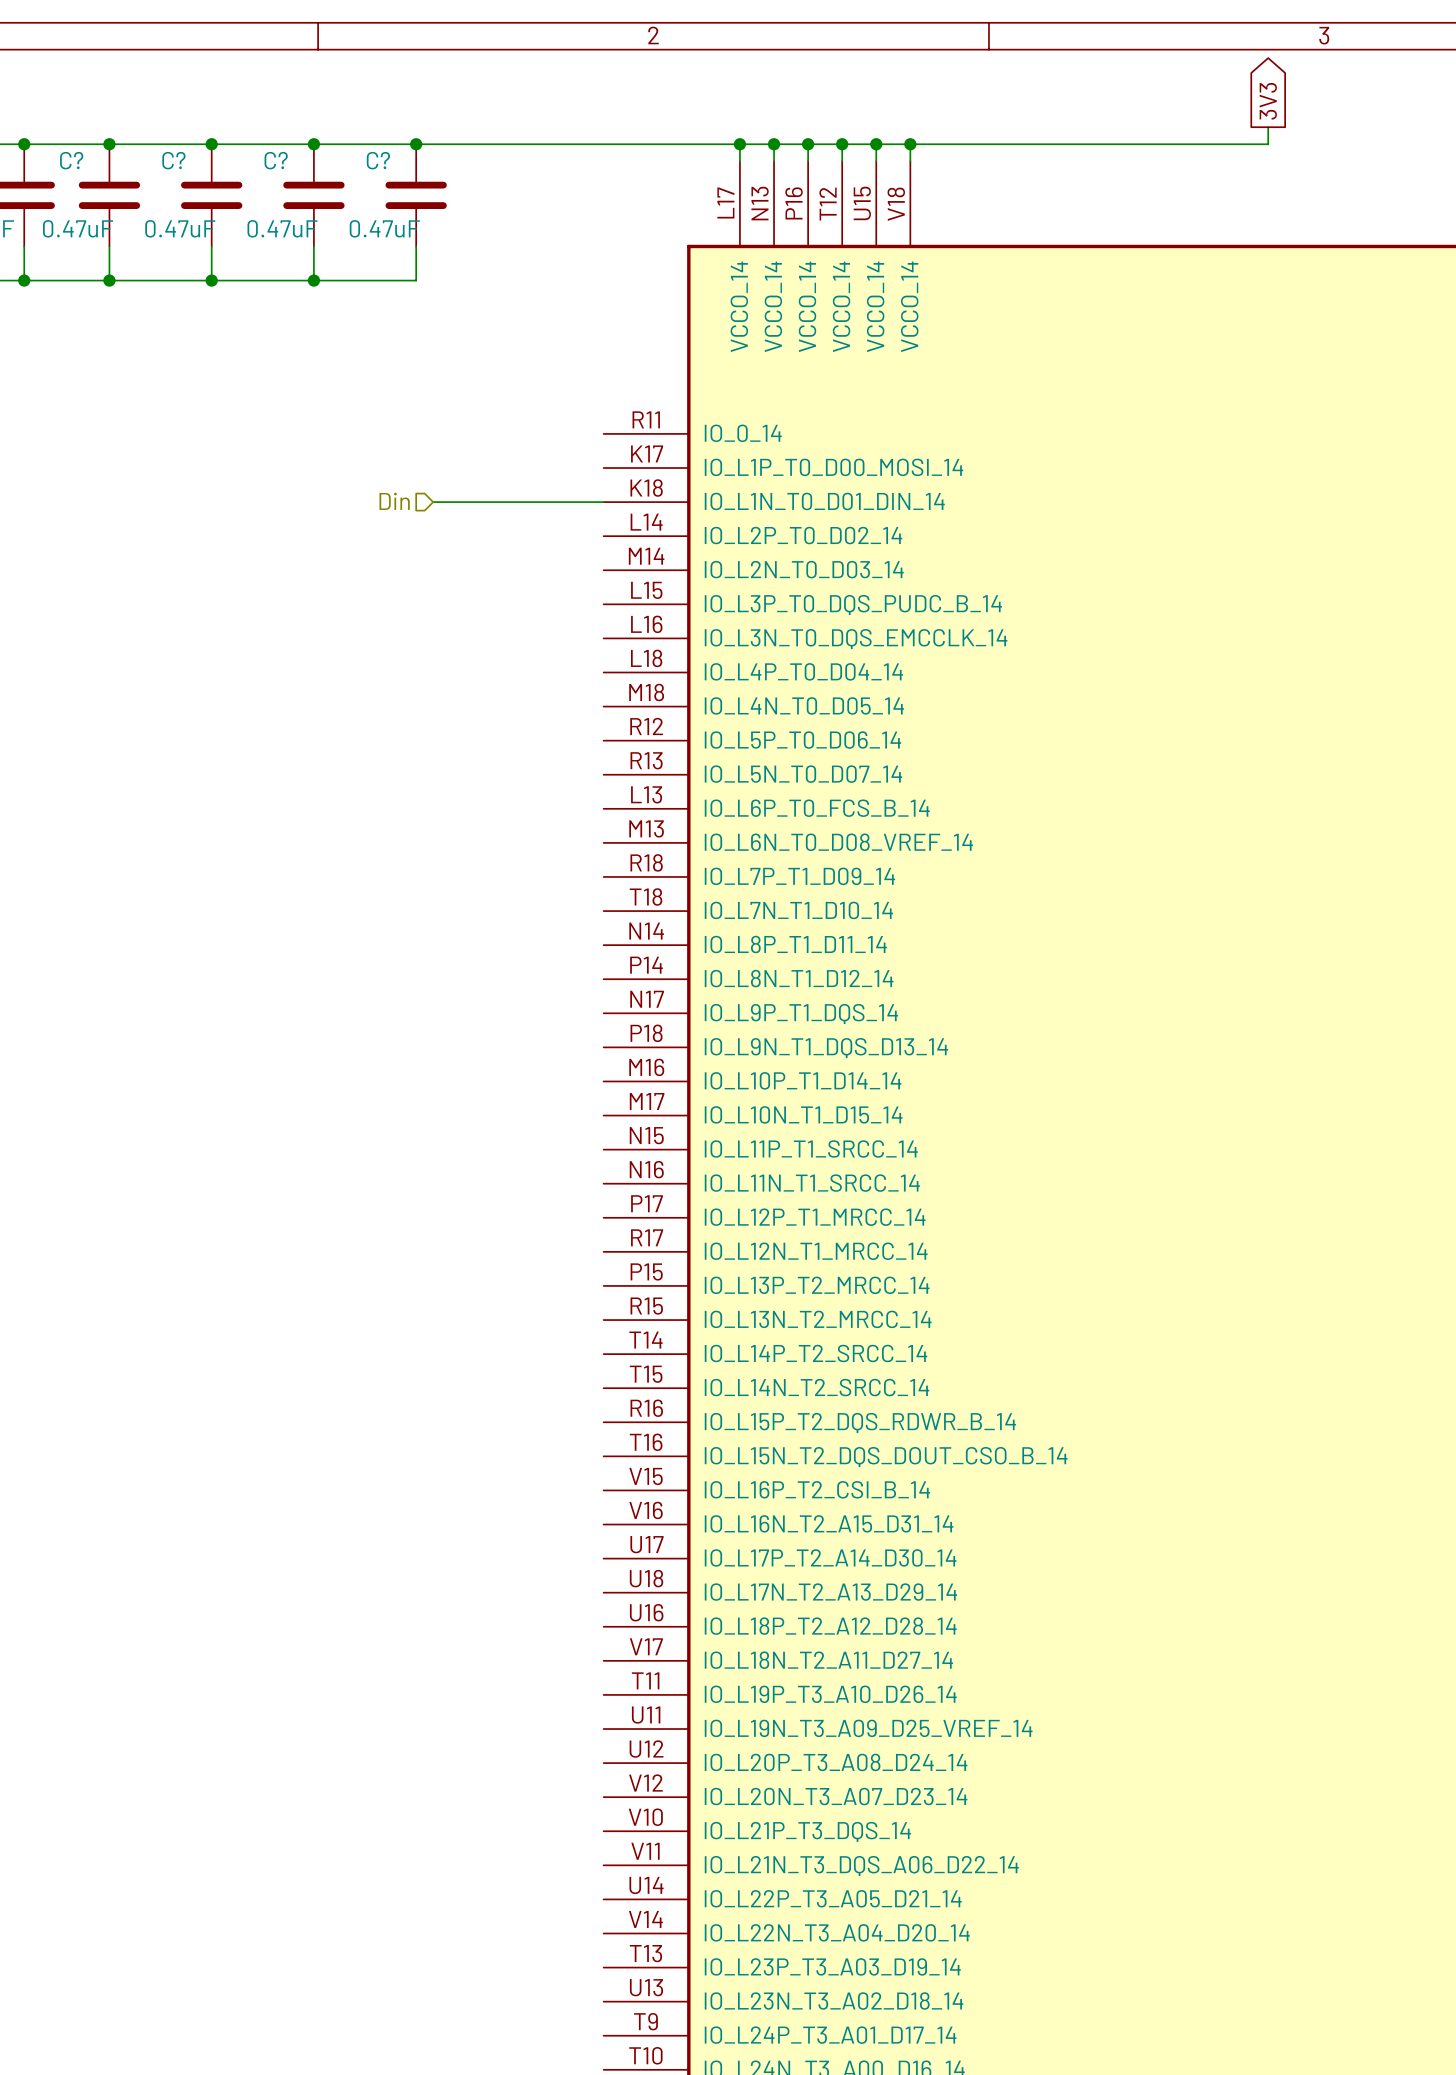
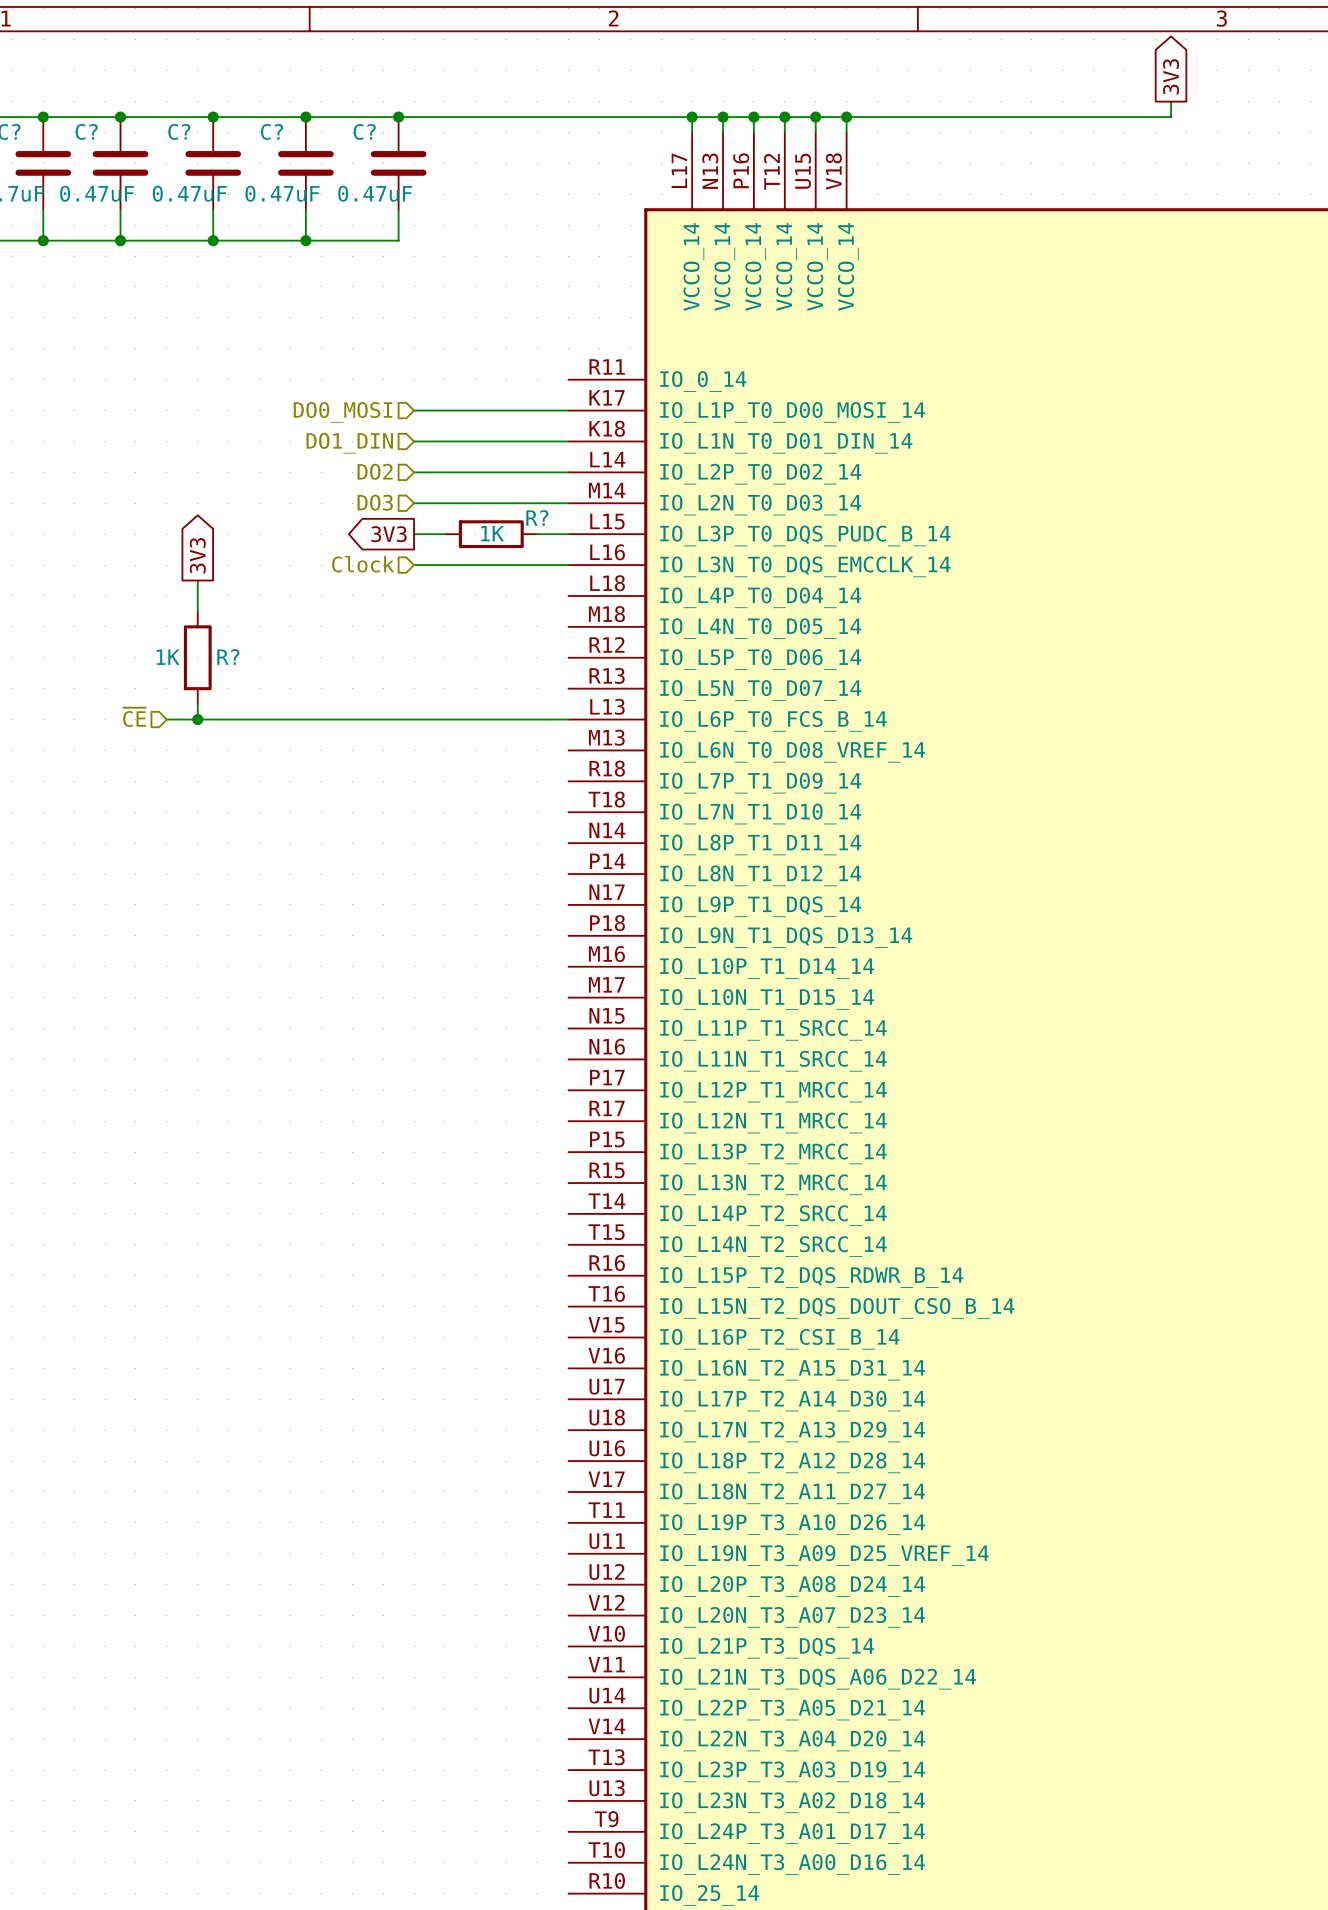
hierarchical label: none -> DO0_MOSI (343, 412)
wire: none -> (414, 410) (568, 410)
hierarchical label: Din (394, 501) -> DO1_DIN (349, 443)
hierarchical label: none -> DO2 (375, 471)
wire: none -> (414, 472) (568, 472)
hierarchical label: none -> DO3 (375, 502)
wire: none -> (414, 503) (568, 503)
global label: none -> 3V3 (389, 534)
wire: none -> (414, 534) (444, 534)
R?: none -> 1K (491, 534)
wire: none -> (537, 534) (568, 534)
global label: none -> 3V3 (197, 555)
hierarchical label: none -> Clock (363, 564)
wire: none -> (414, 565) (568, 565)
wire: none -> (197, 580) (197, 611)
R?: none -> 1K (197, 657)
wire: none -> (197, 704) (197, 719)
hierarchical label: none -> ~{CE} (134, 717)
wire: none -> (166, 719) (568, 719)
junction: none -> (197, 719)

